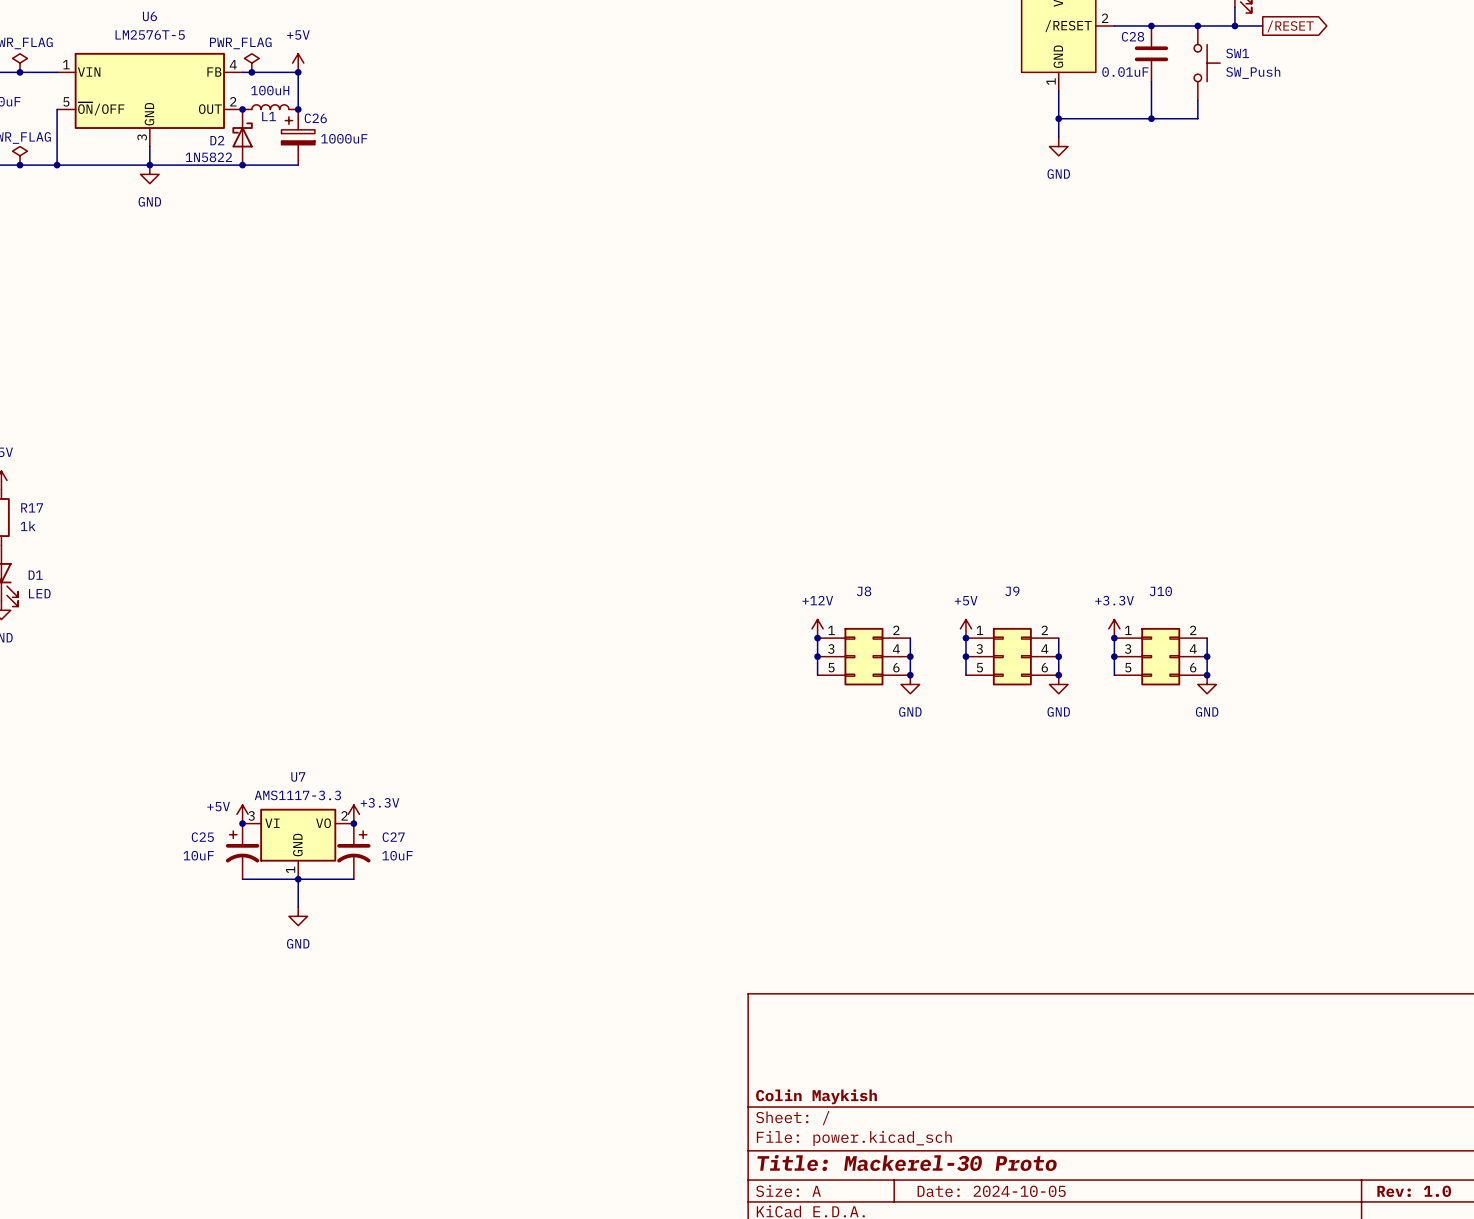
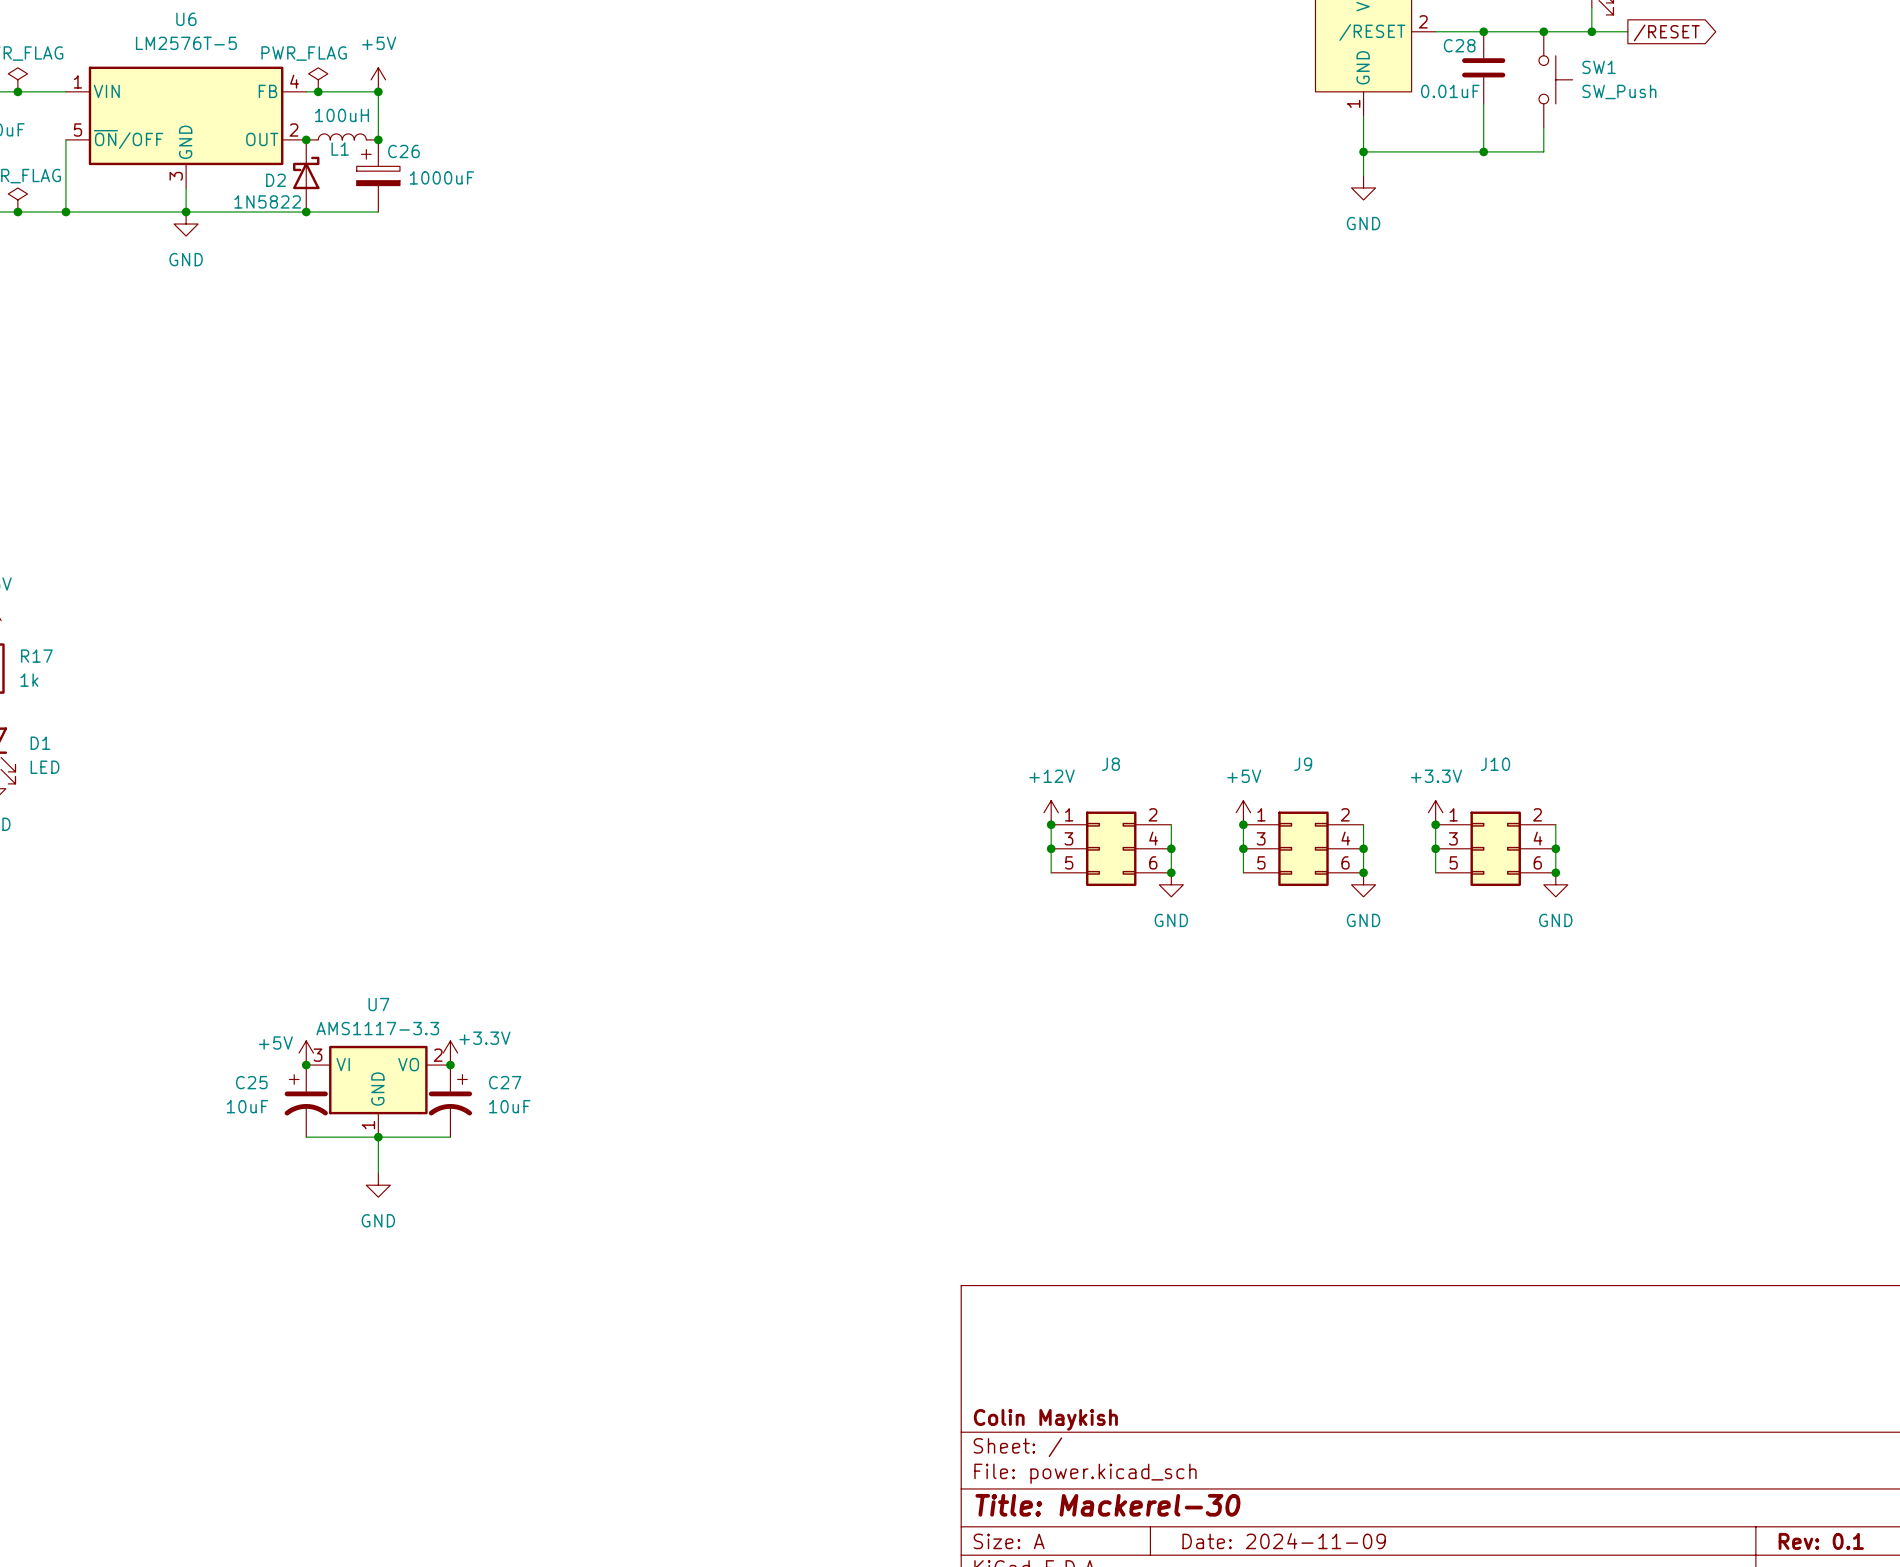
title block: Title: Mackerel-30 Proto (907, 1163) -> Title: Mackerel-30 (1107, 1505)
title block: Date: 2024-10-05 (991, 1191) -> Date: 2024-11-09 (1284, 1541)
title block: Rev: 1.0 (1414, 1191) -> Rev: 0.1 (1821, 1541)

